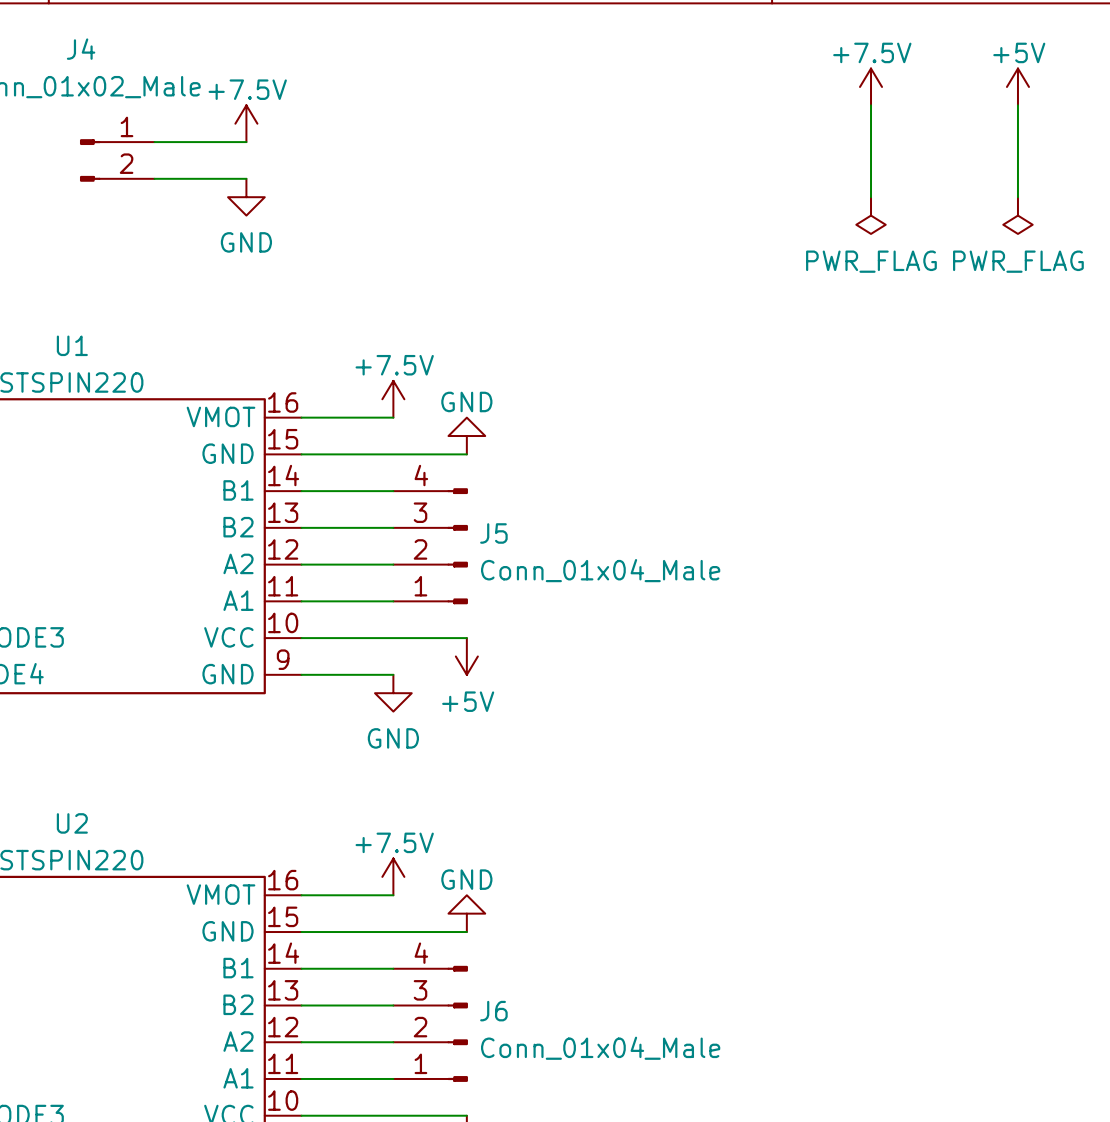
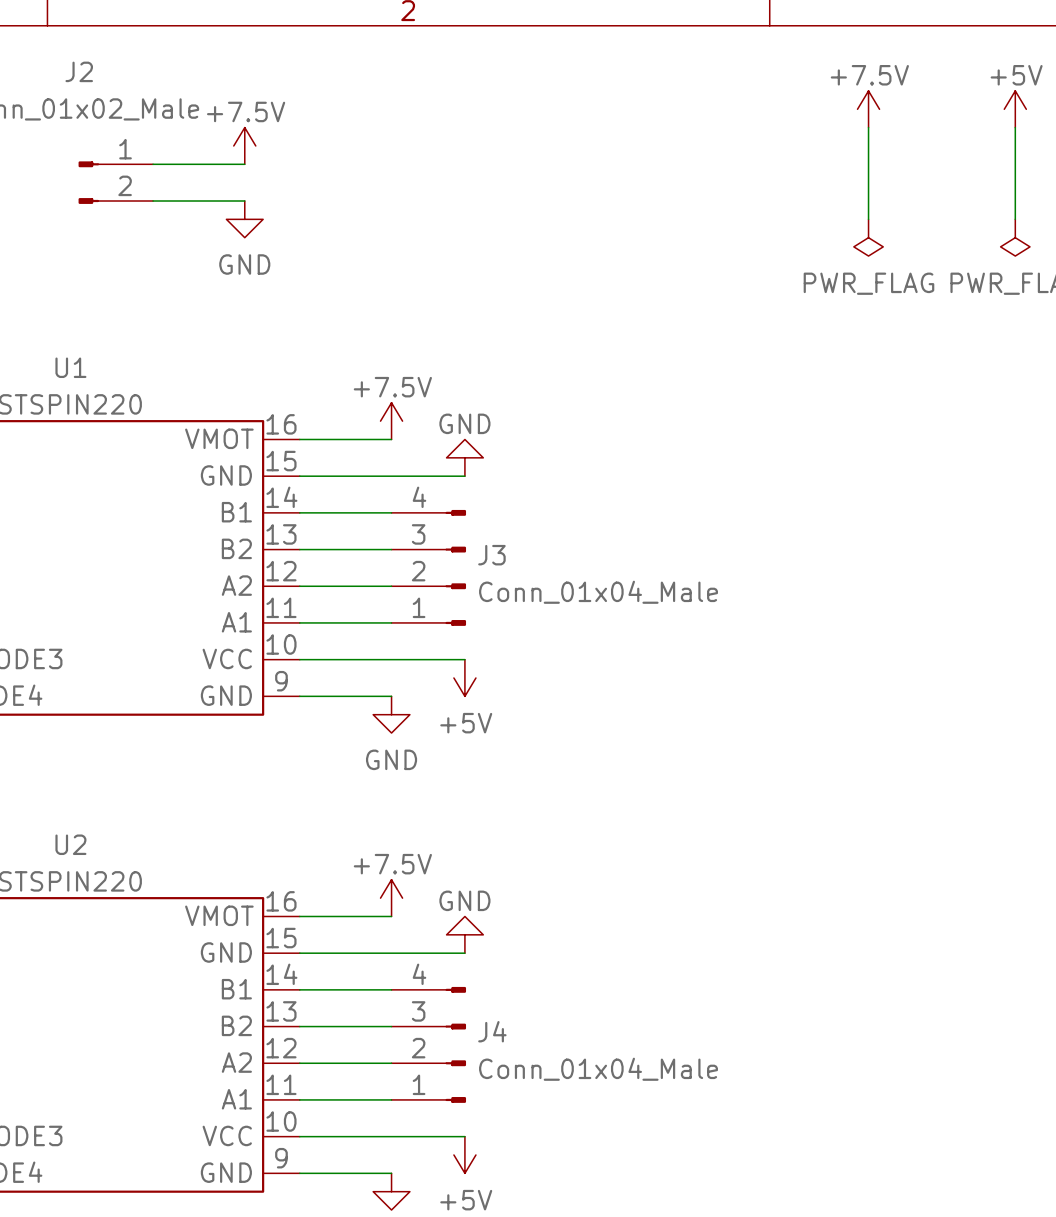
J4 name: J4 (81, 49) -> J2 (79, 71)
J5 name: J5 (493, 533) -> J3 (491, 555)
J6 name: J6 (493, 1011) -> J4 (492, 1031)

